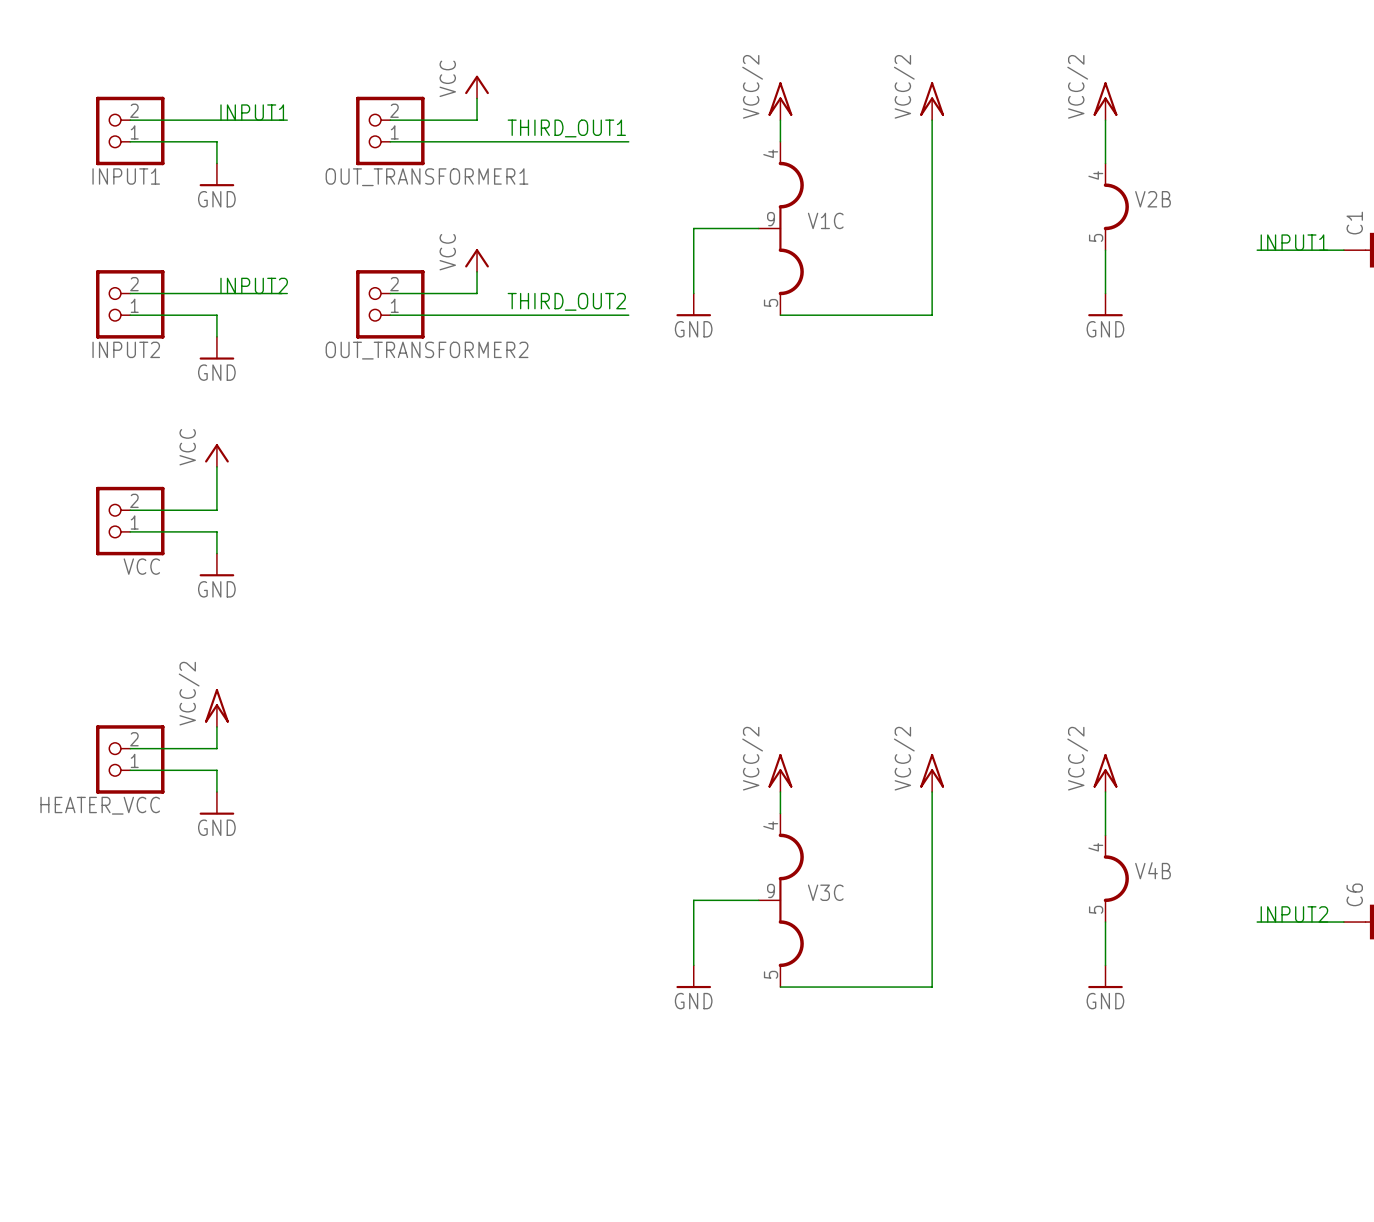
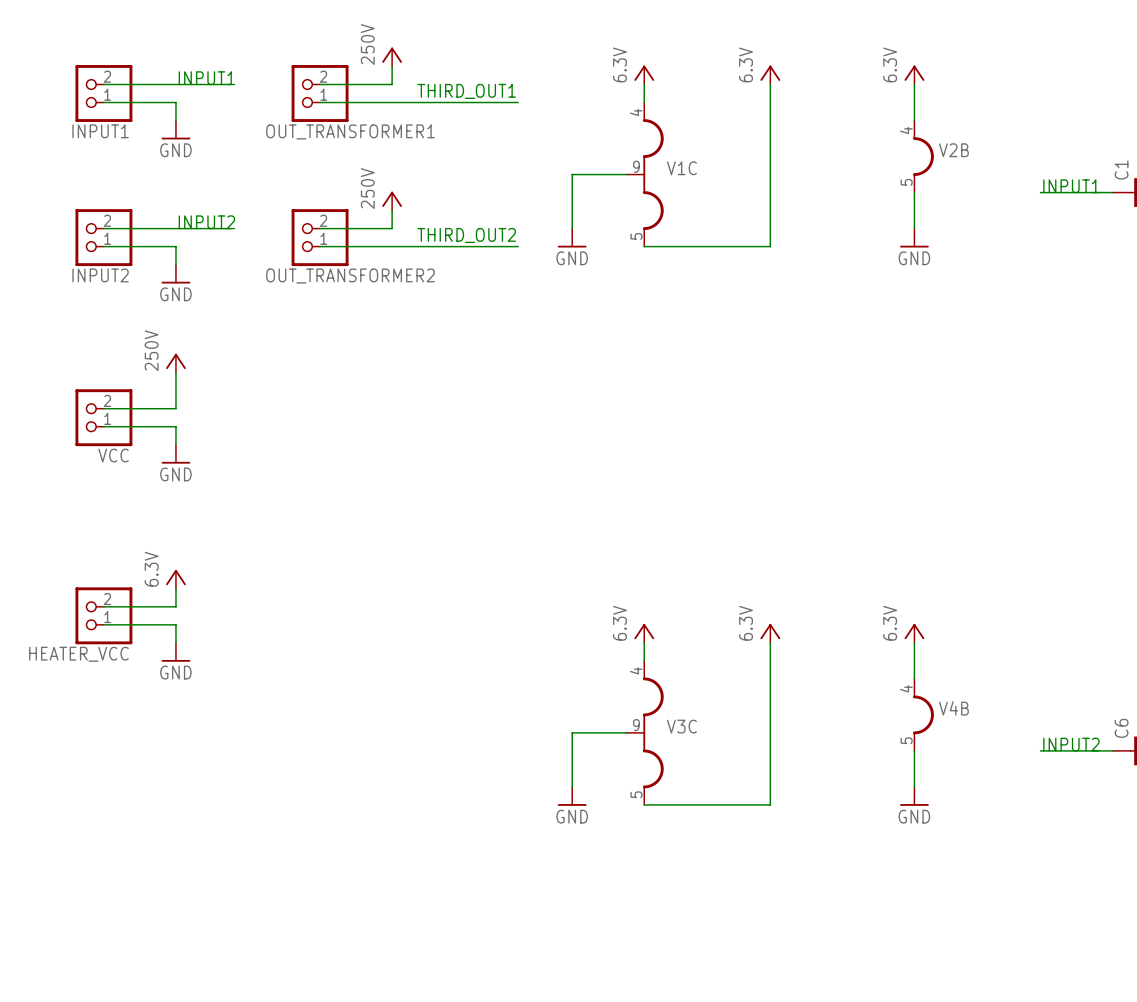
power symbol: VCC (477, 87) -> 250V (392, 57)
power symbol: VCC/2 (780, 101) -> 6.3V (644, 75)
power symbol: VCC/2 (932, 101) -> 6.3V (770, 75)
power symbol: VCC/2 (1105, 101) -> 6.3V (914, 75)
power symbol: VCC (477, 260) -> 250V (392, 201)
power symbol: VCC (216, 455) -> 250V (175, 363)
power symbol: VCC/2 (216, 708) -> 6.3V (175, 579)
power symbol: VCC/2 (780, 773) -> 6.3V (644, 633)
power symbol: VCC/2 (932, 773) -> 6.3V (770, 633)
power symbol: VCC/2 (1105, 773) -> 6.3V (914, 633)

